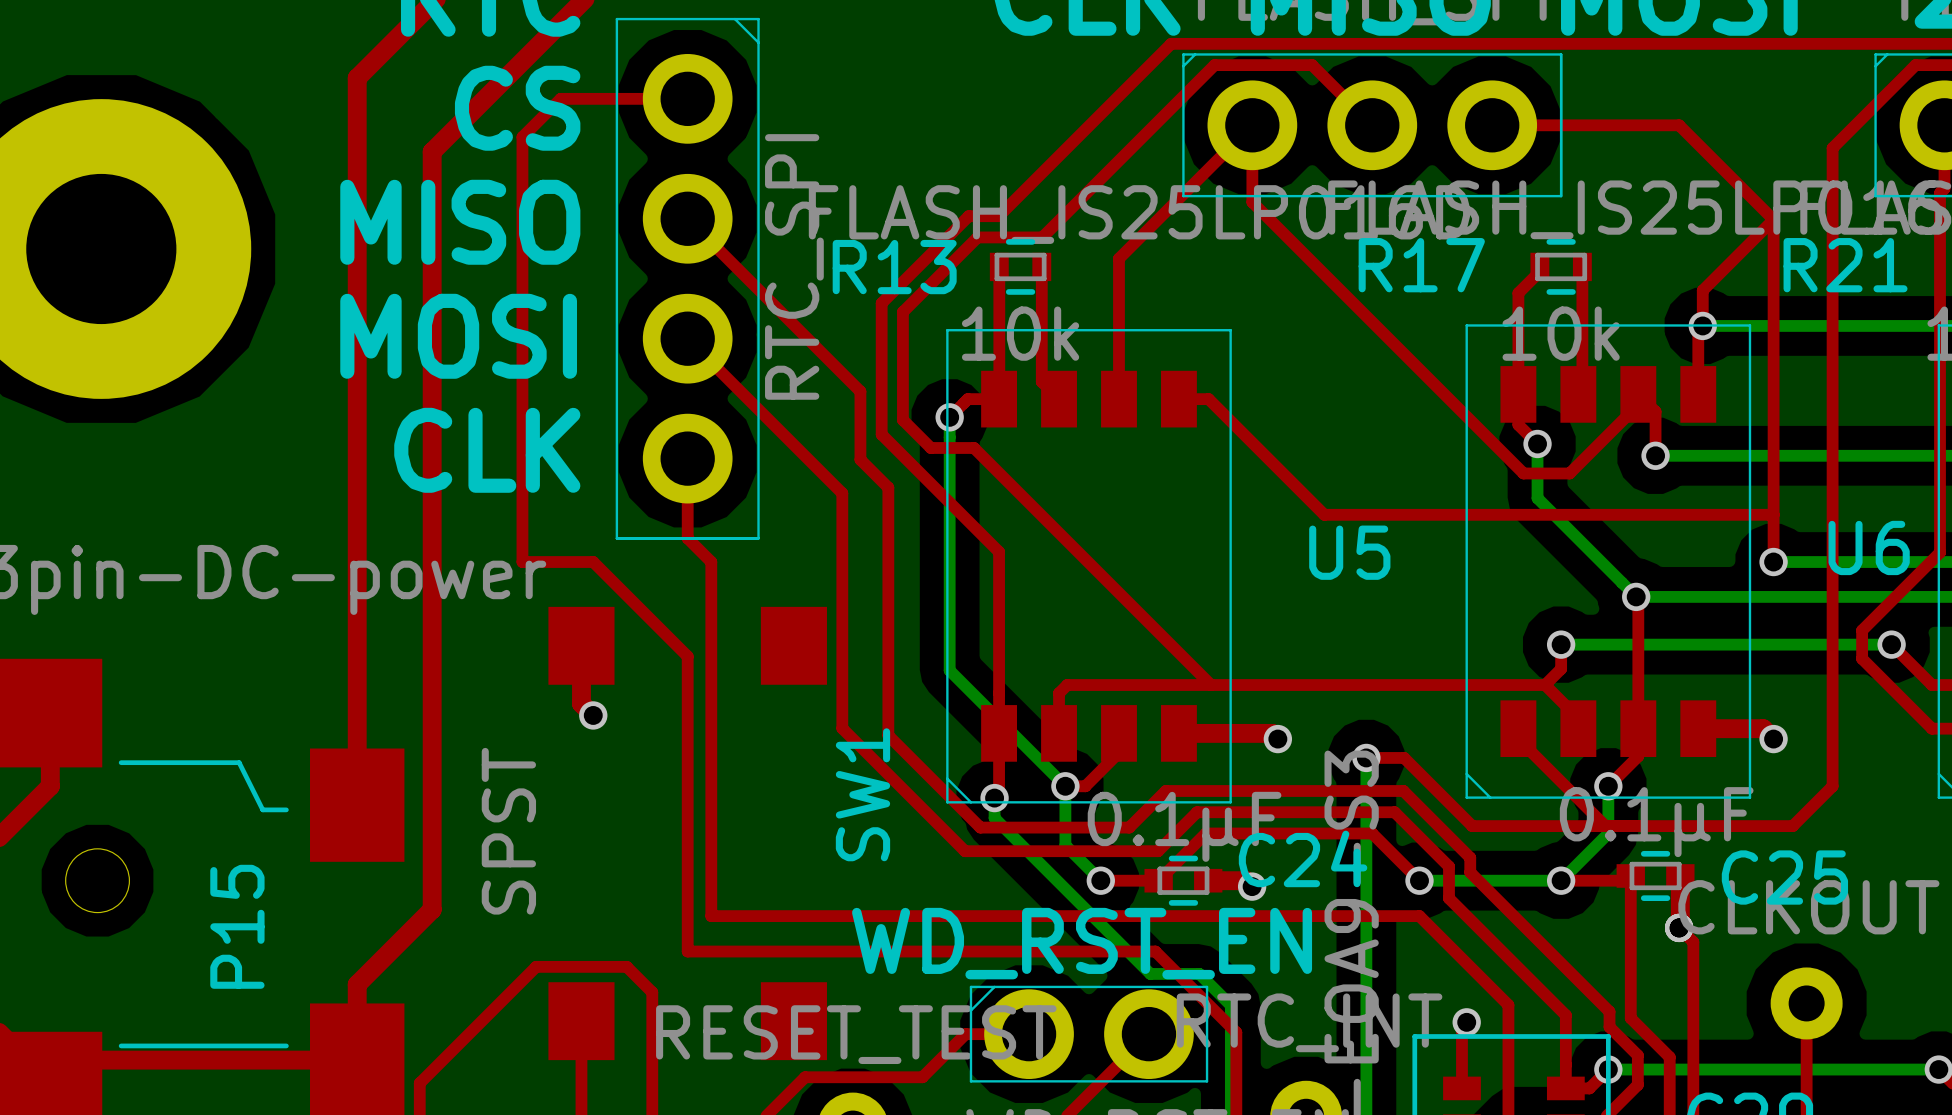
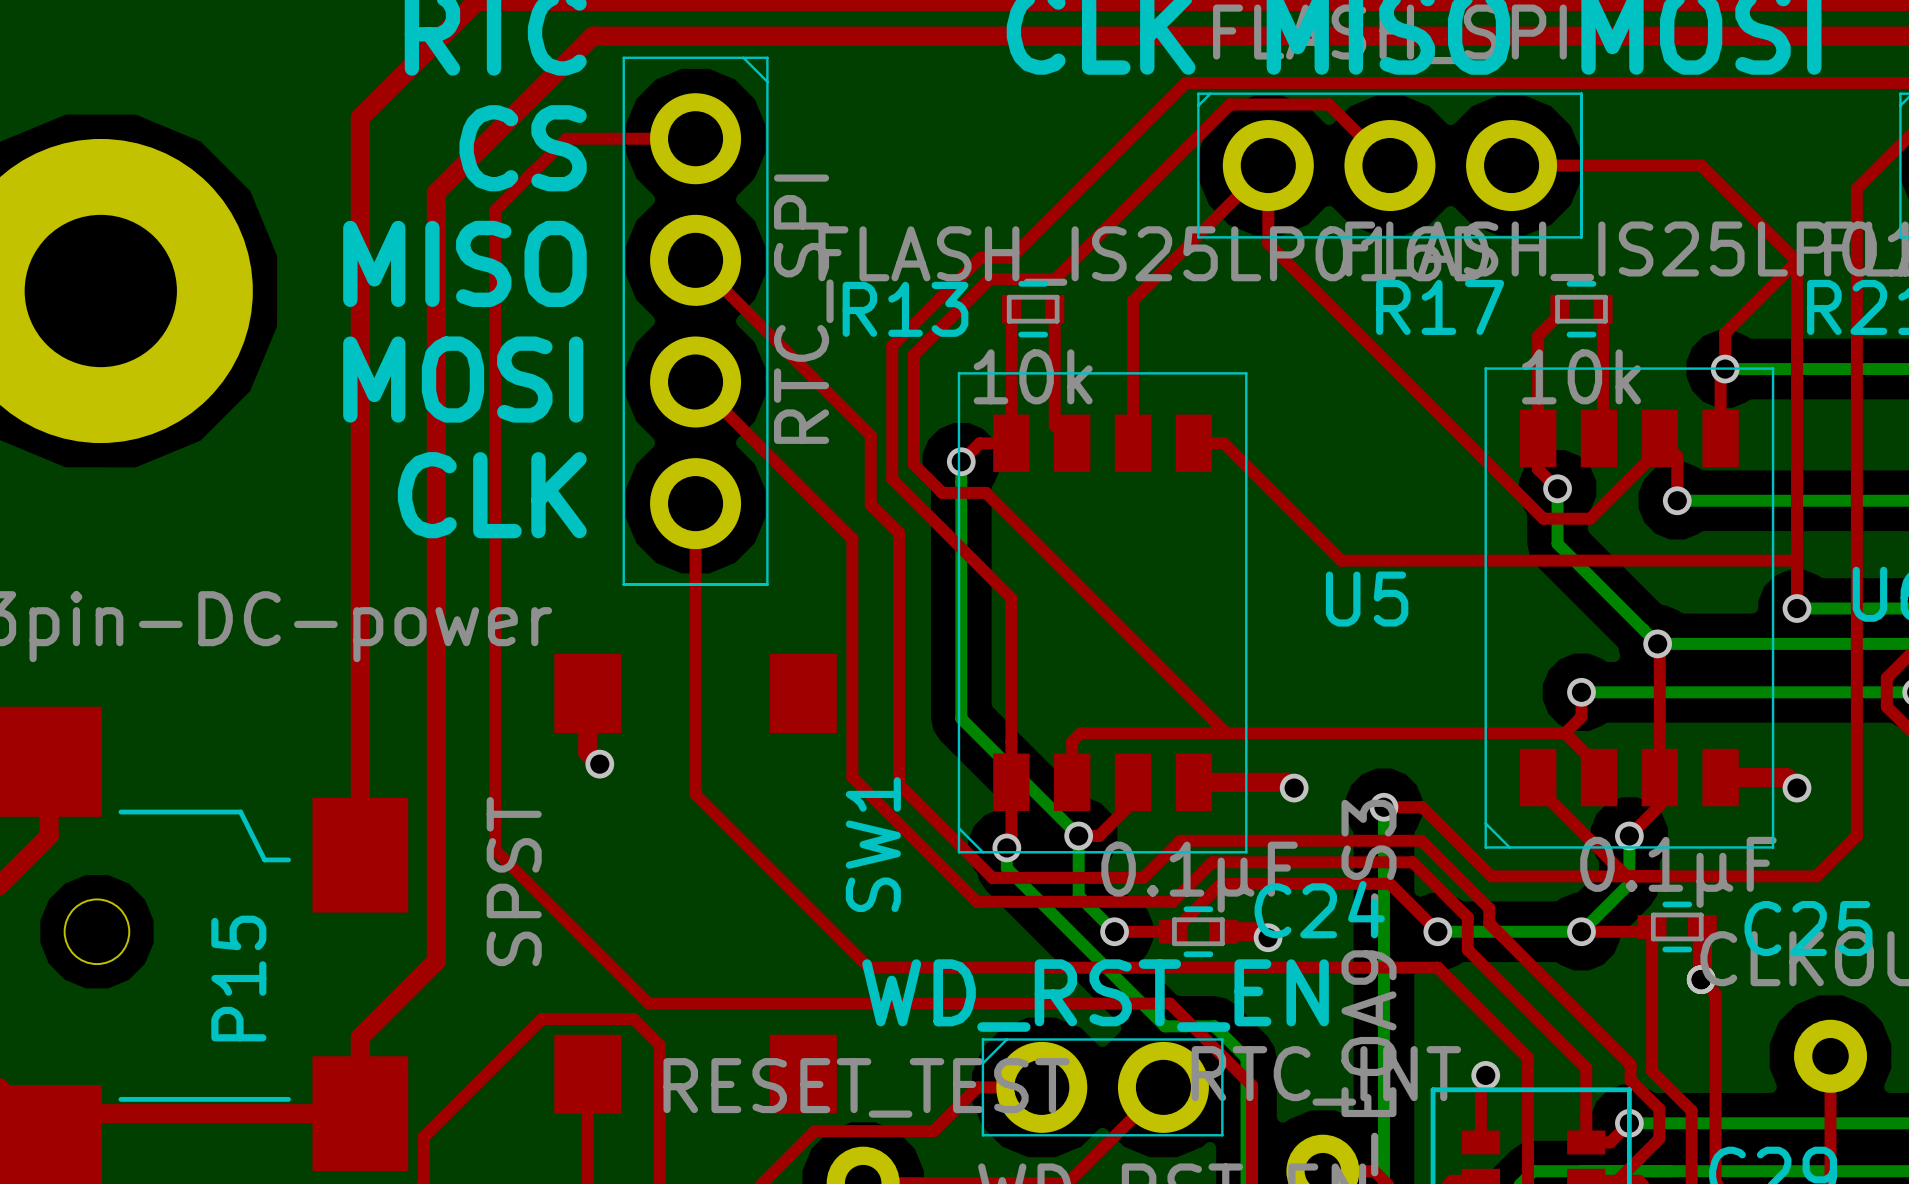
top track: (522, 137) (522, 562) (593, 562) (687, 656) -> (527, 177) (495, 210) (495, 850) (648, 1003) (695, 1003)
top track: (687, 538) (711, 562) (711, 916) (858, 916) -> (695, 584) (695, 704)
top track: (687, 745) (687, 951) -> (695, 794) (868, 967)

